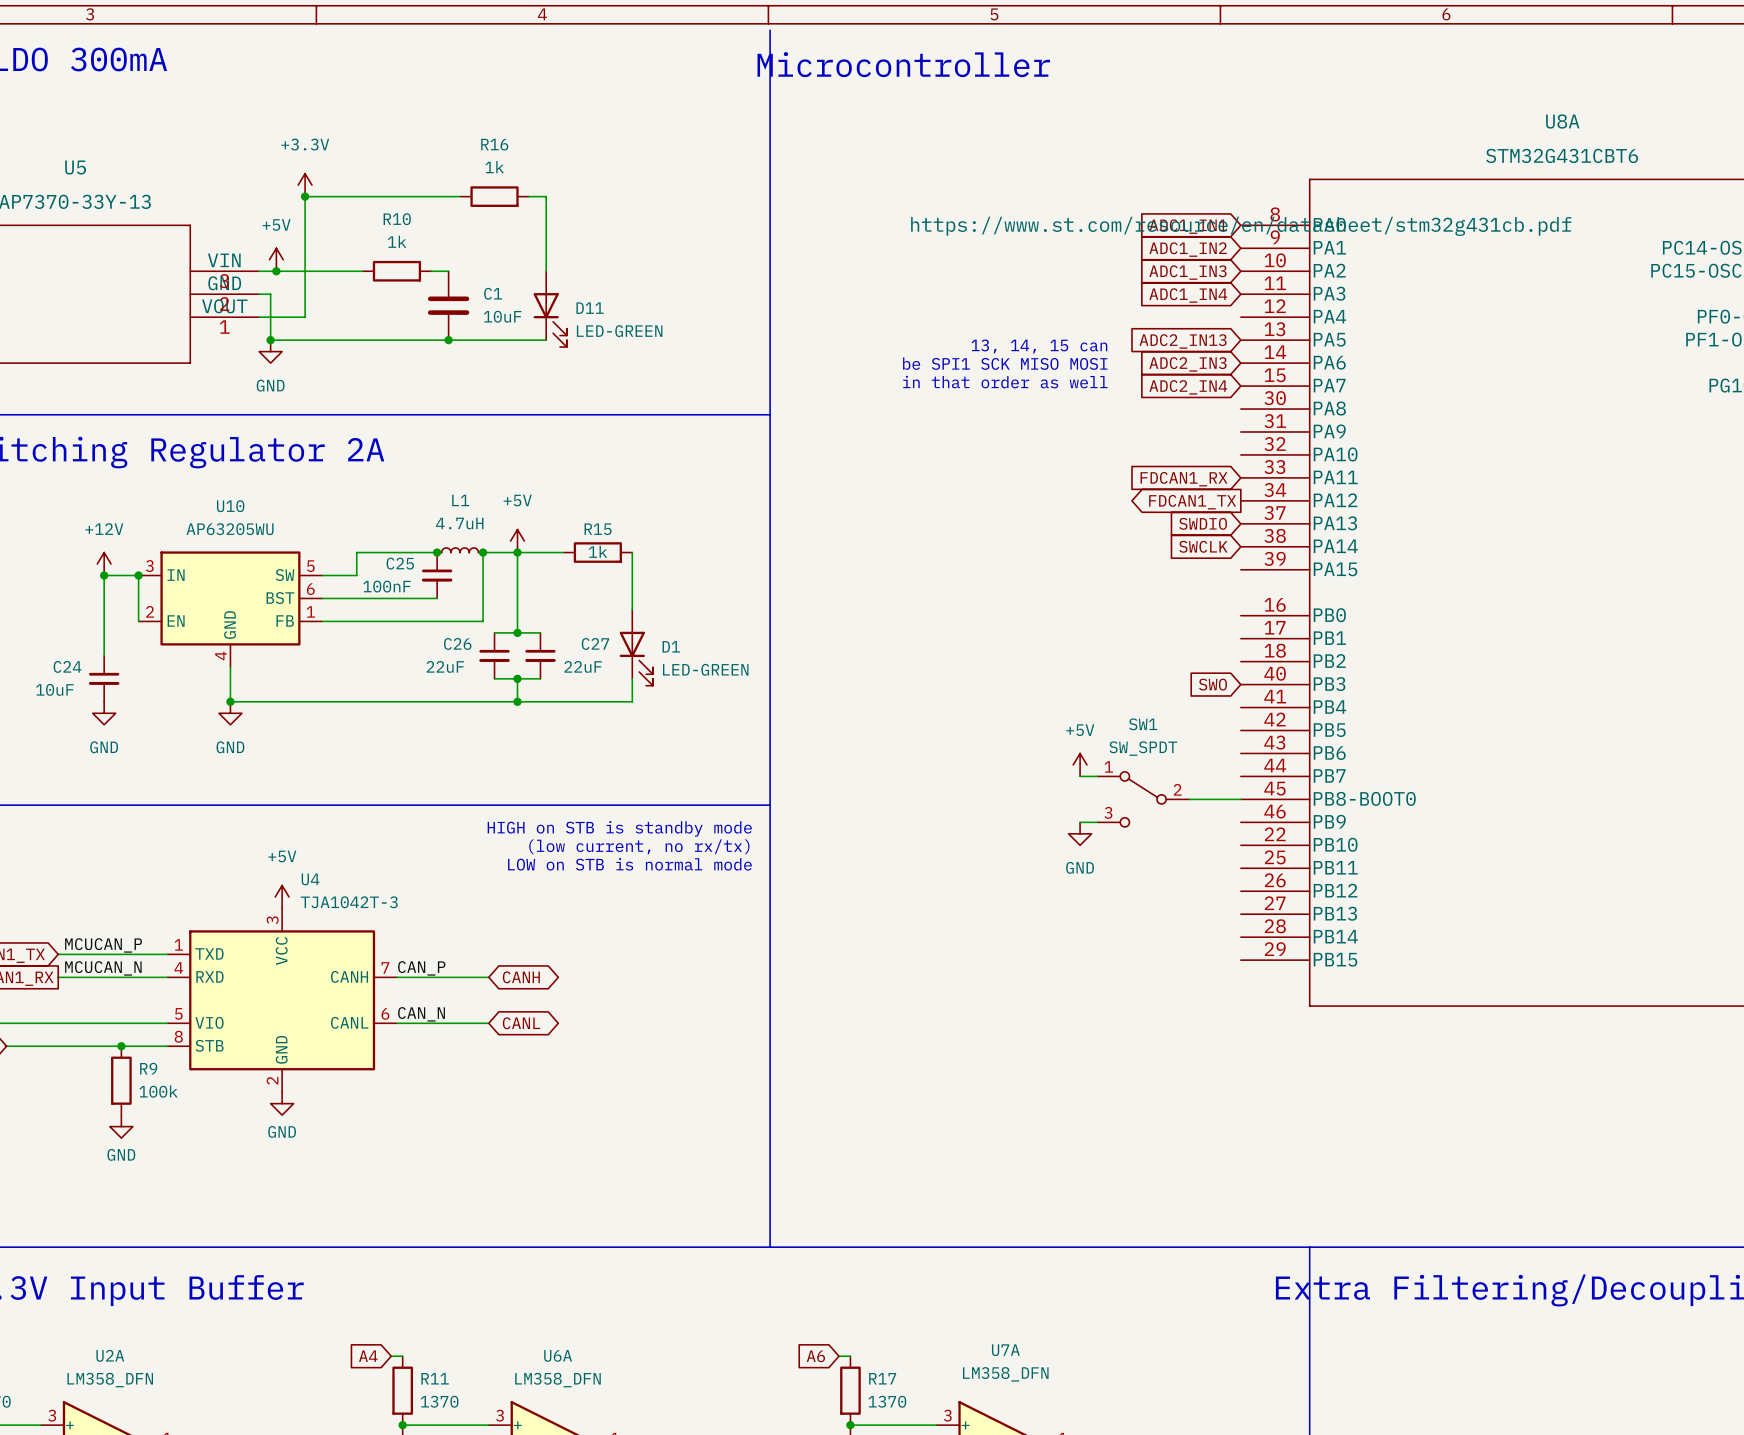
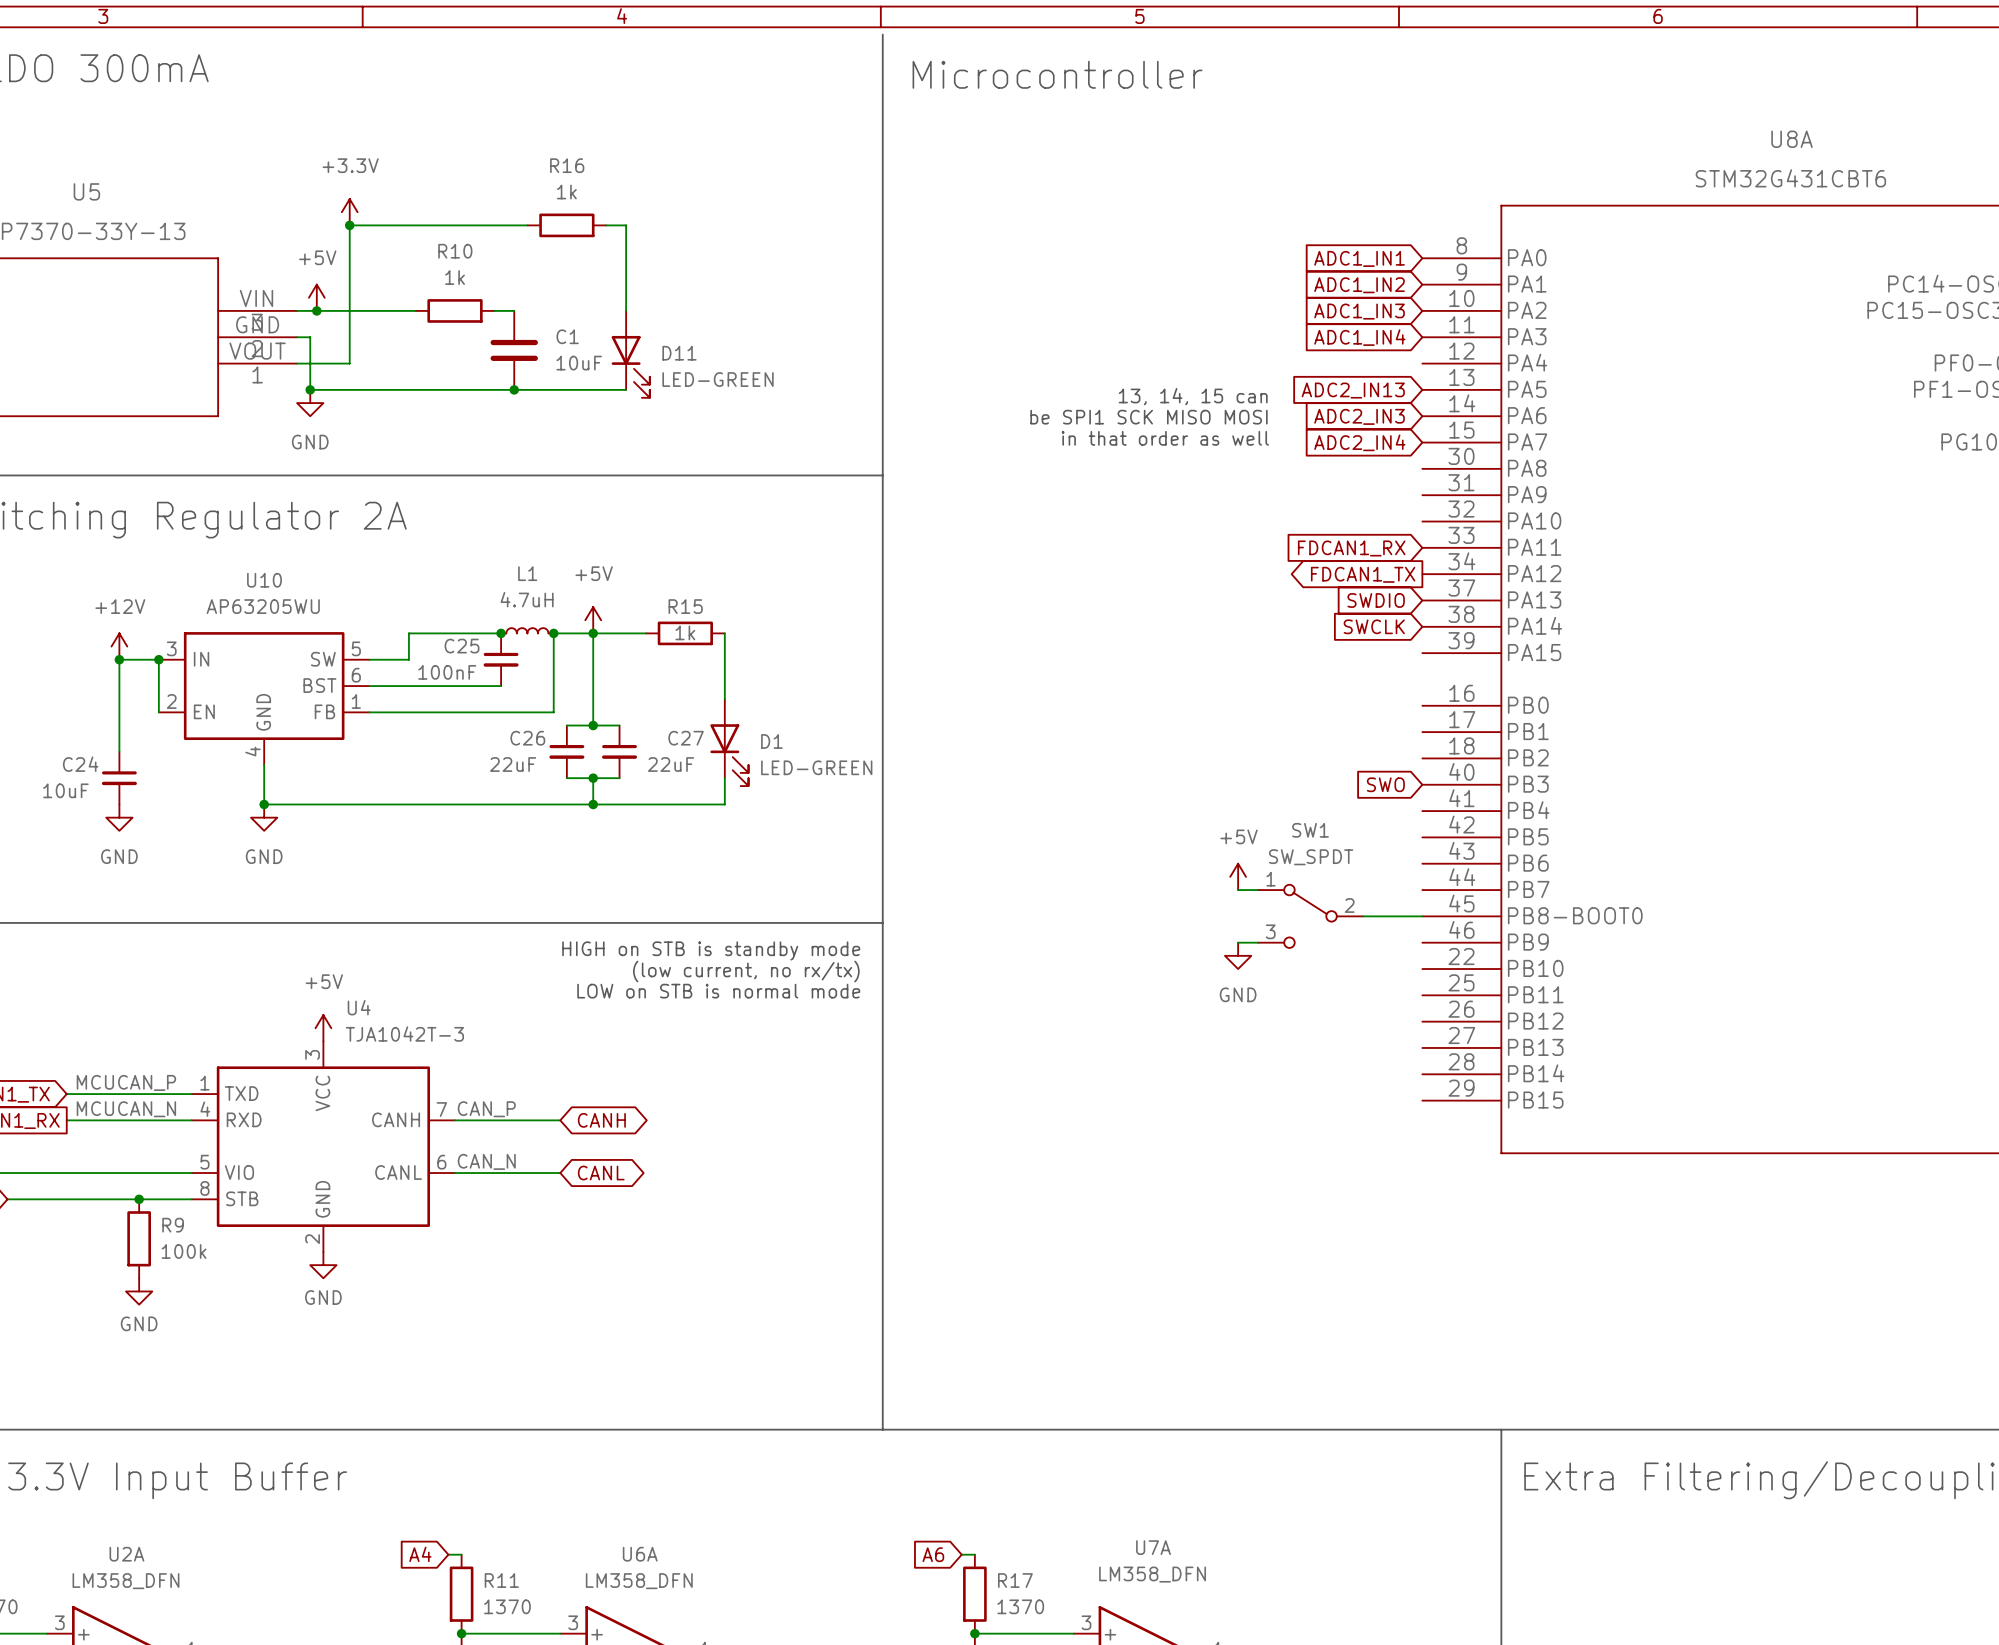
U8A text: https://www.st.com/resource/en/datasheet/stm32g431cb.pdf (1241, 226) -> none

